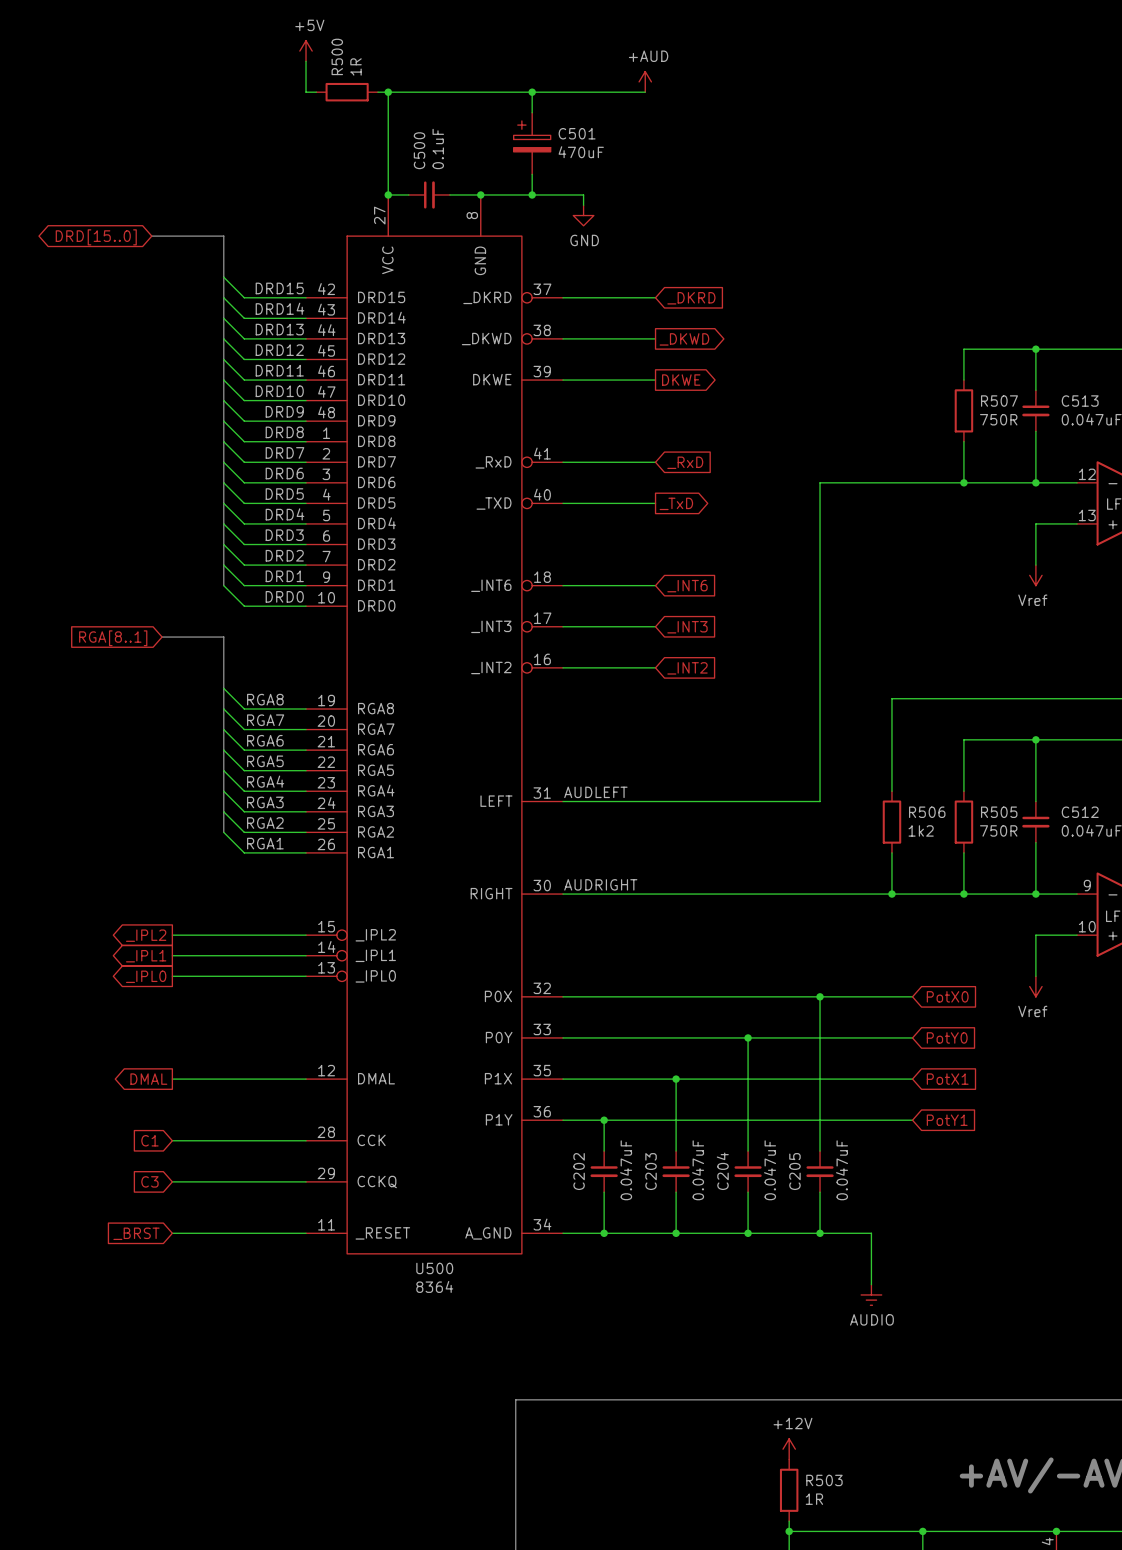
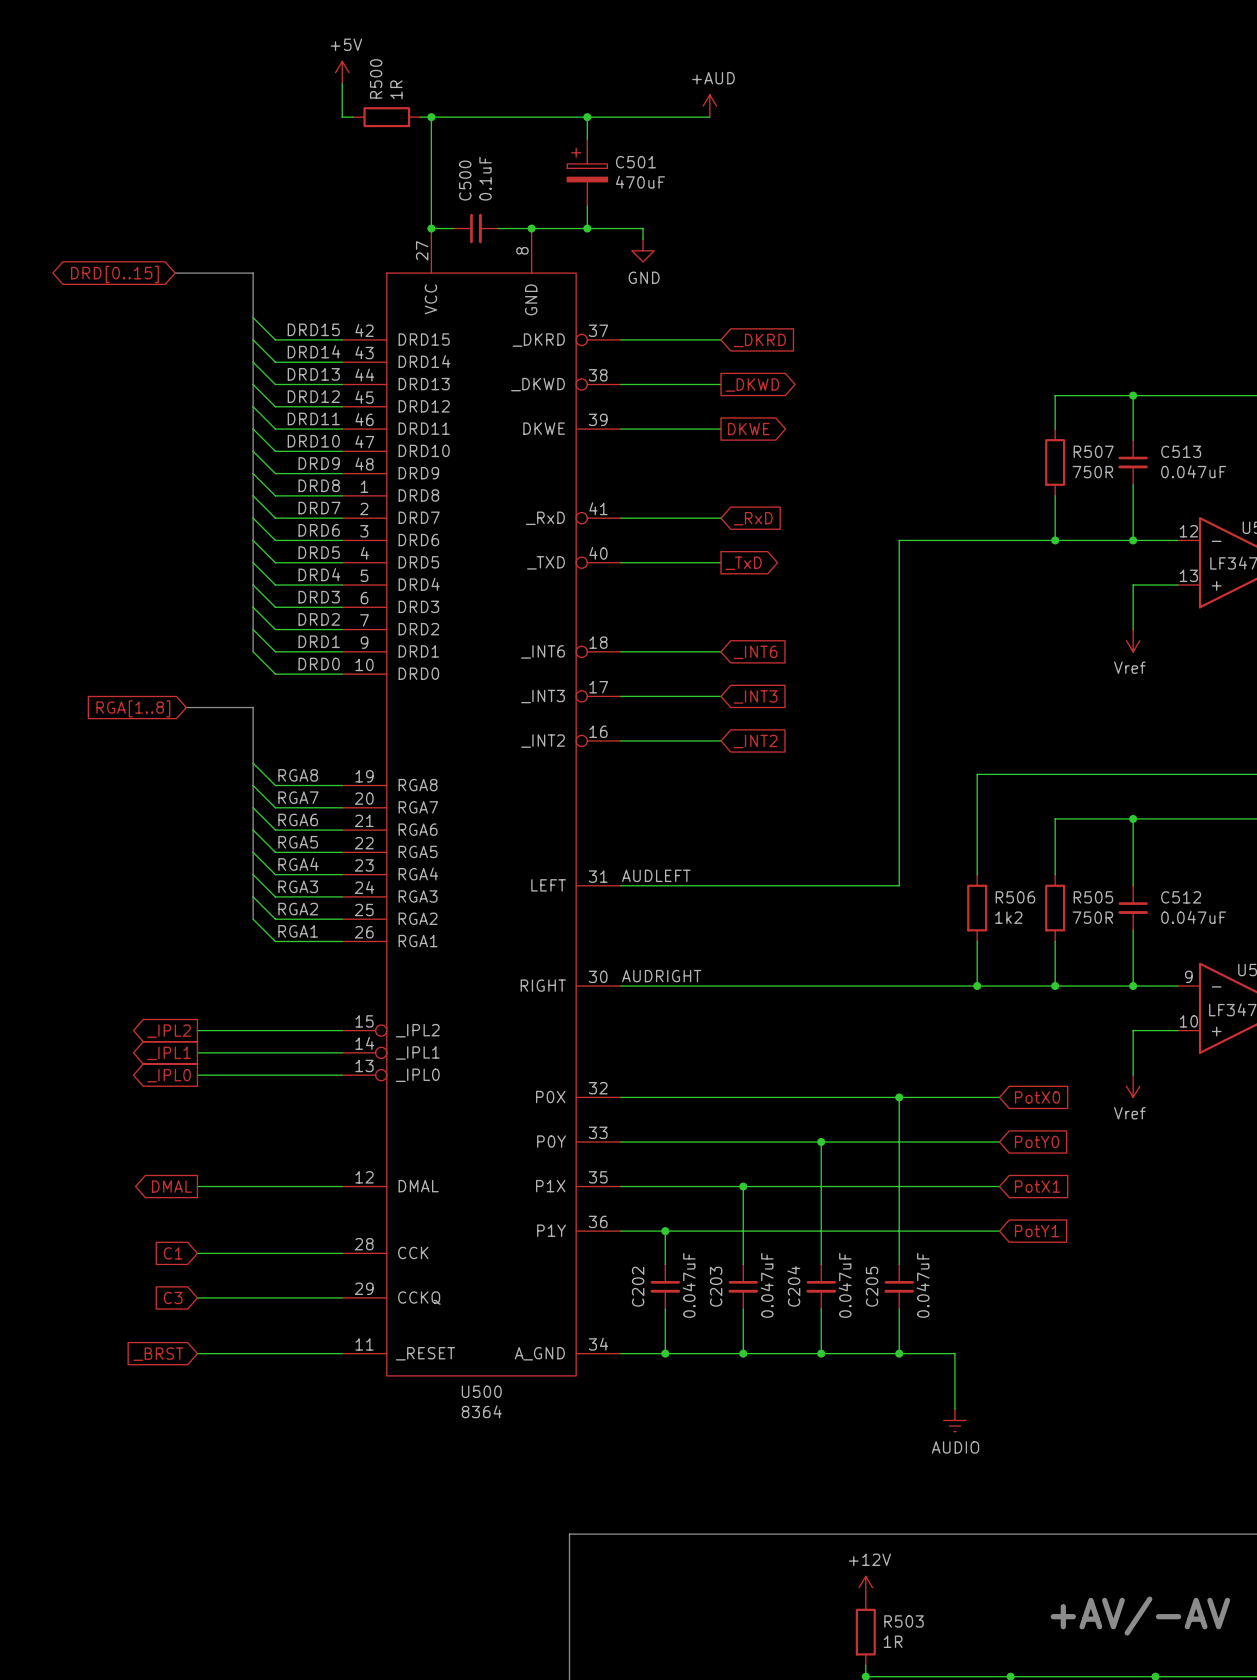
global label: DRD[15..0] (96, 237) -> DRD[0..15] (114, 274)
global label: RGA[8..1] (113, 638) -> RGA[1..8] (133, 708)

